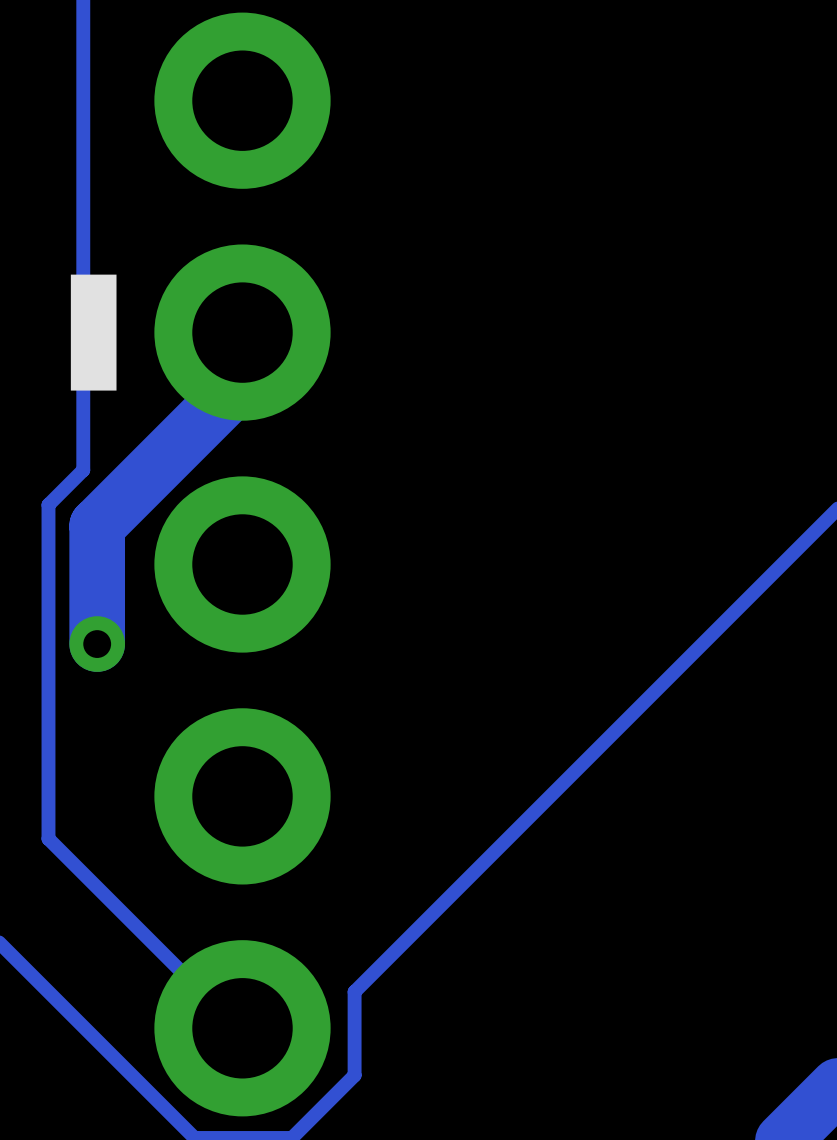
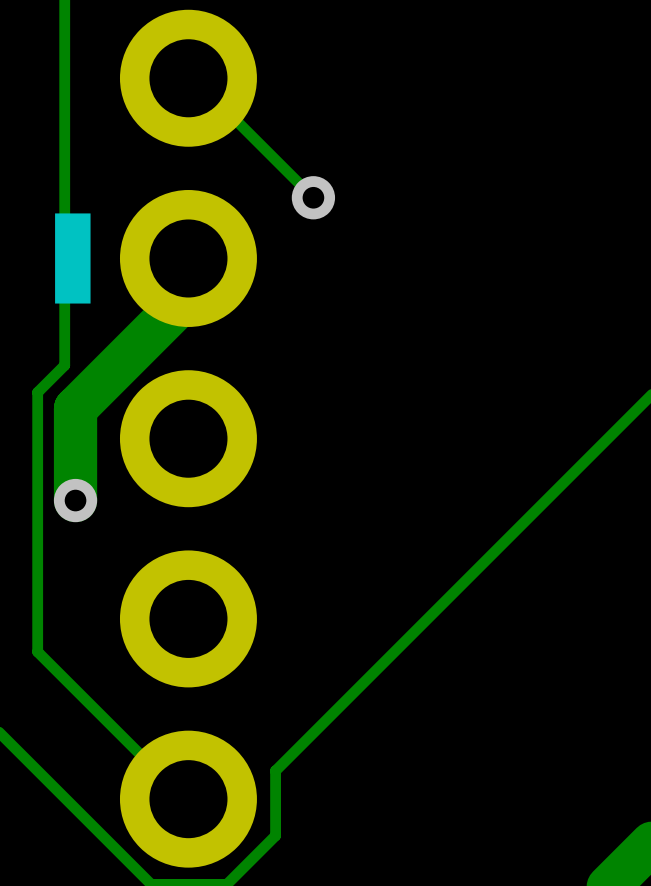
track: none -> (188, 78) (189, 73) (313, 197)
via: none -> (313, 197)

